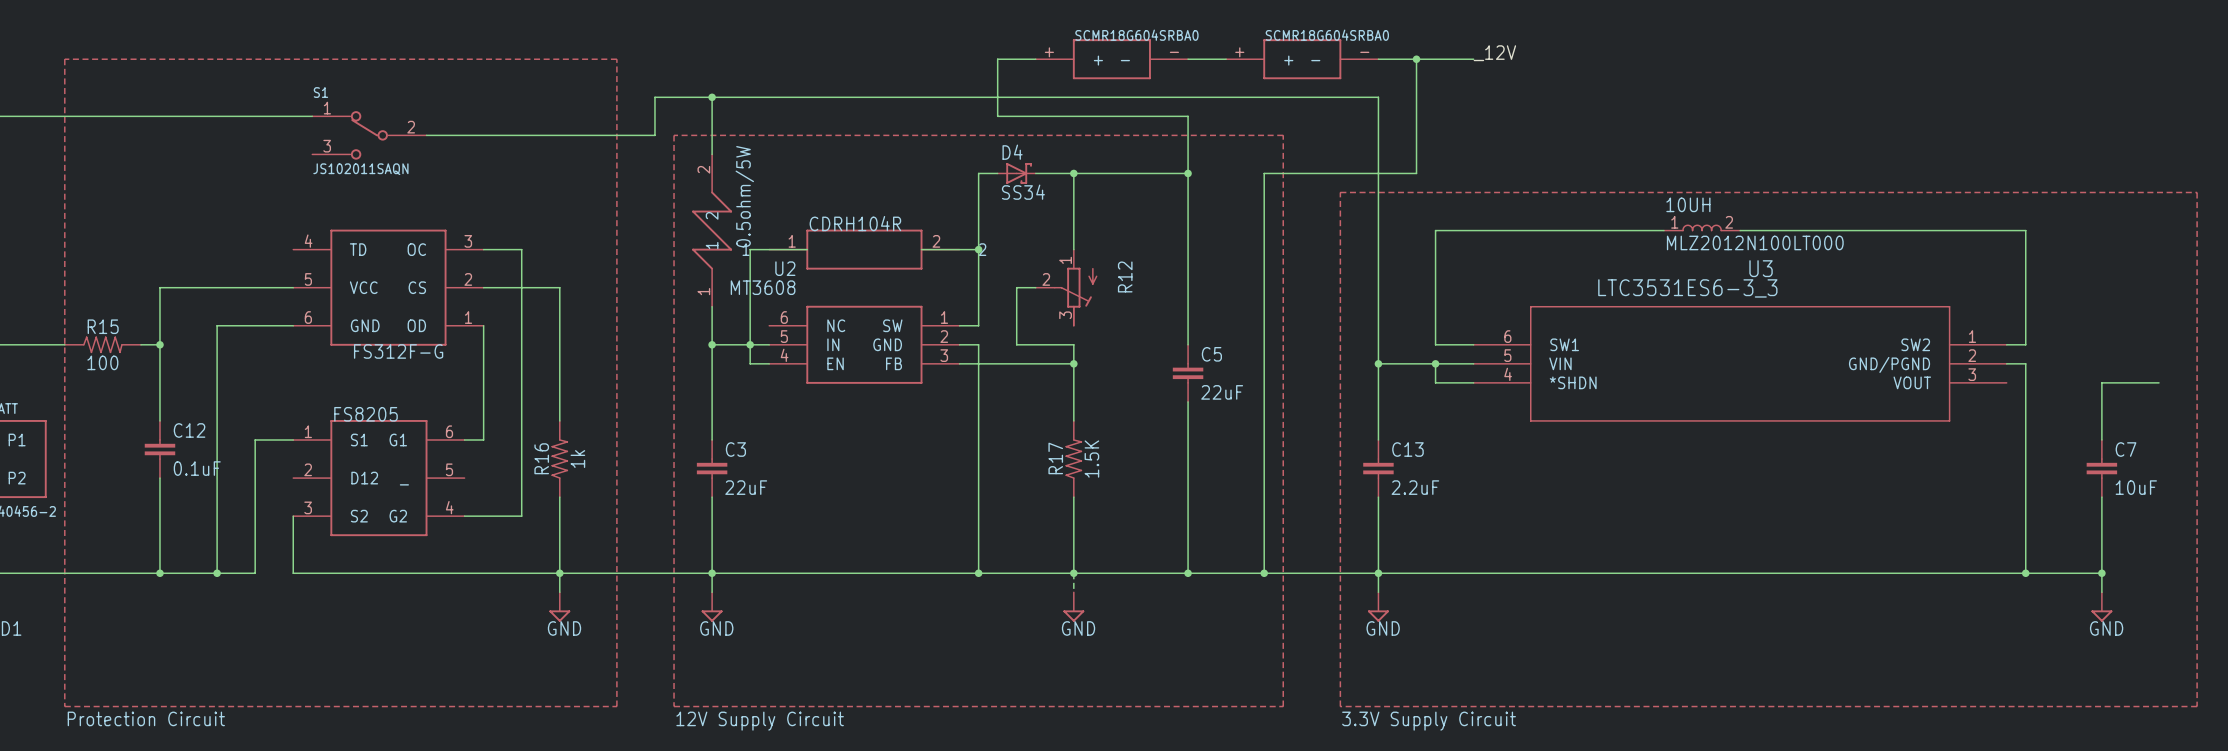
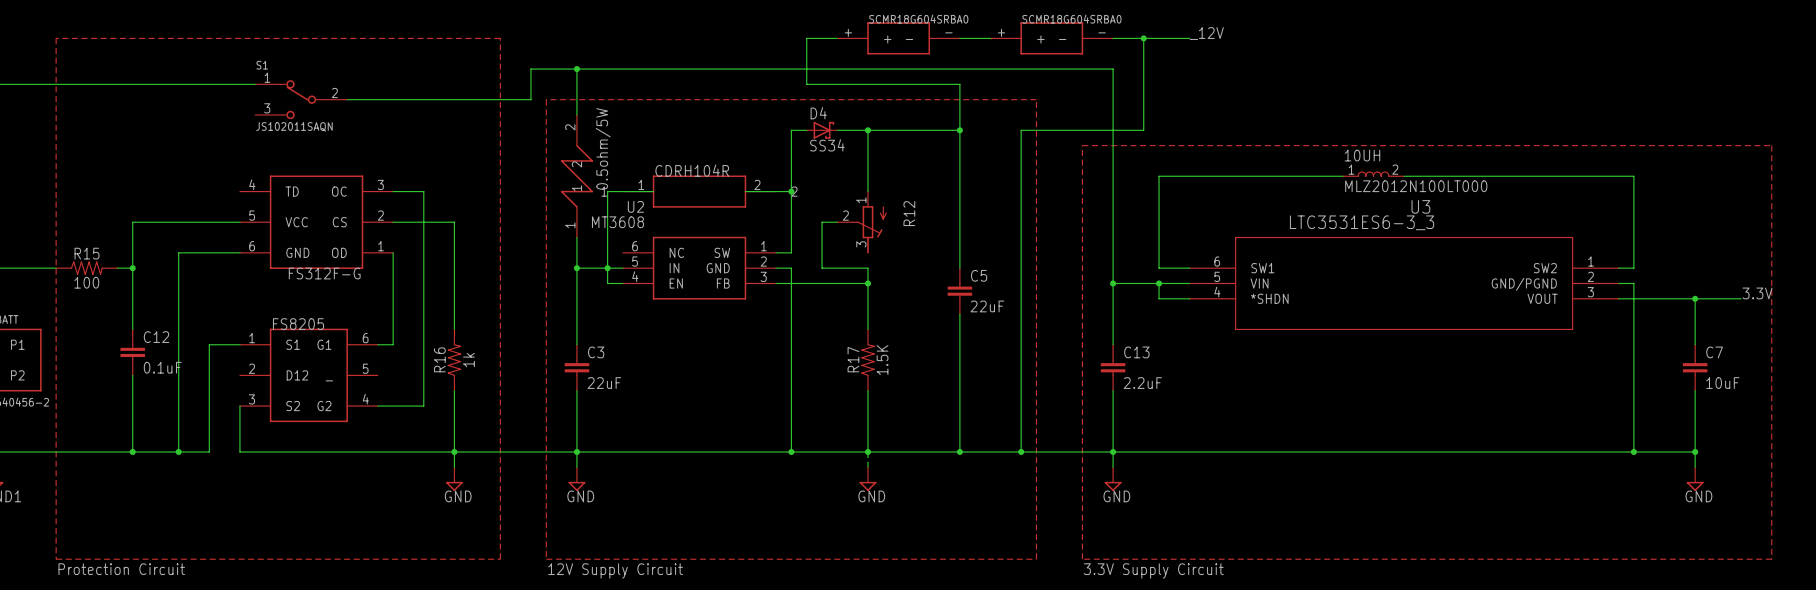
label: none -> 3.3V (1757, 293)
wire: none -> (1618, 298) (1695, 298)
junction: none -> (1695, 298)

